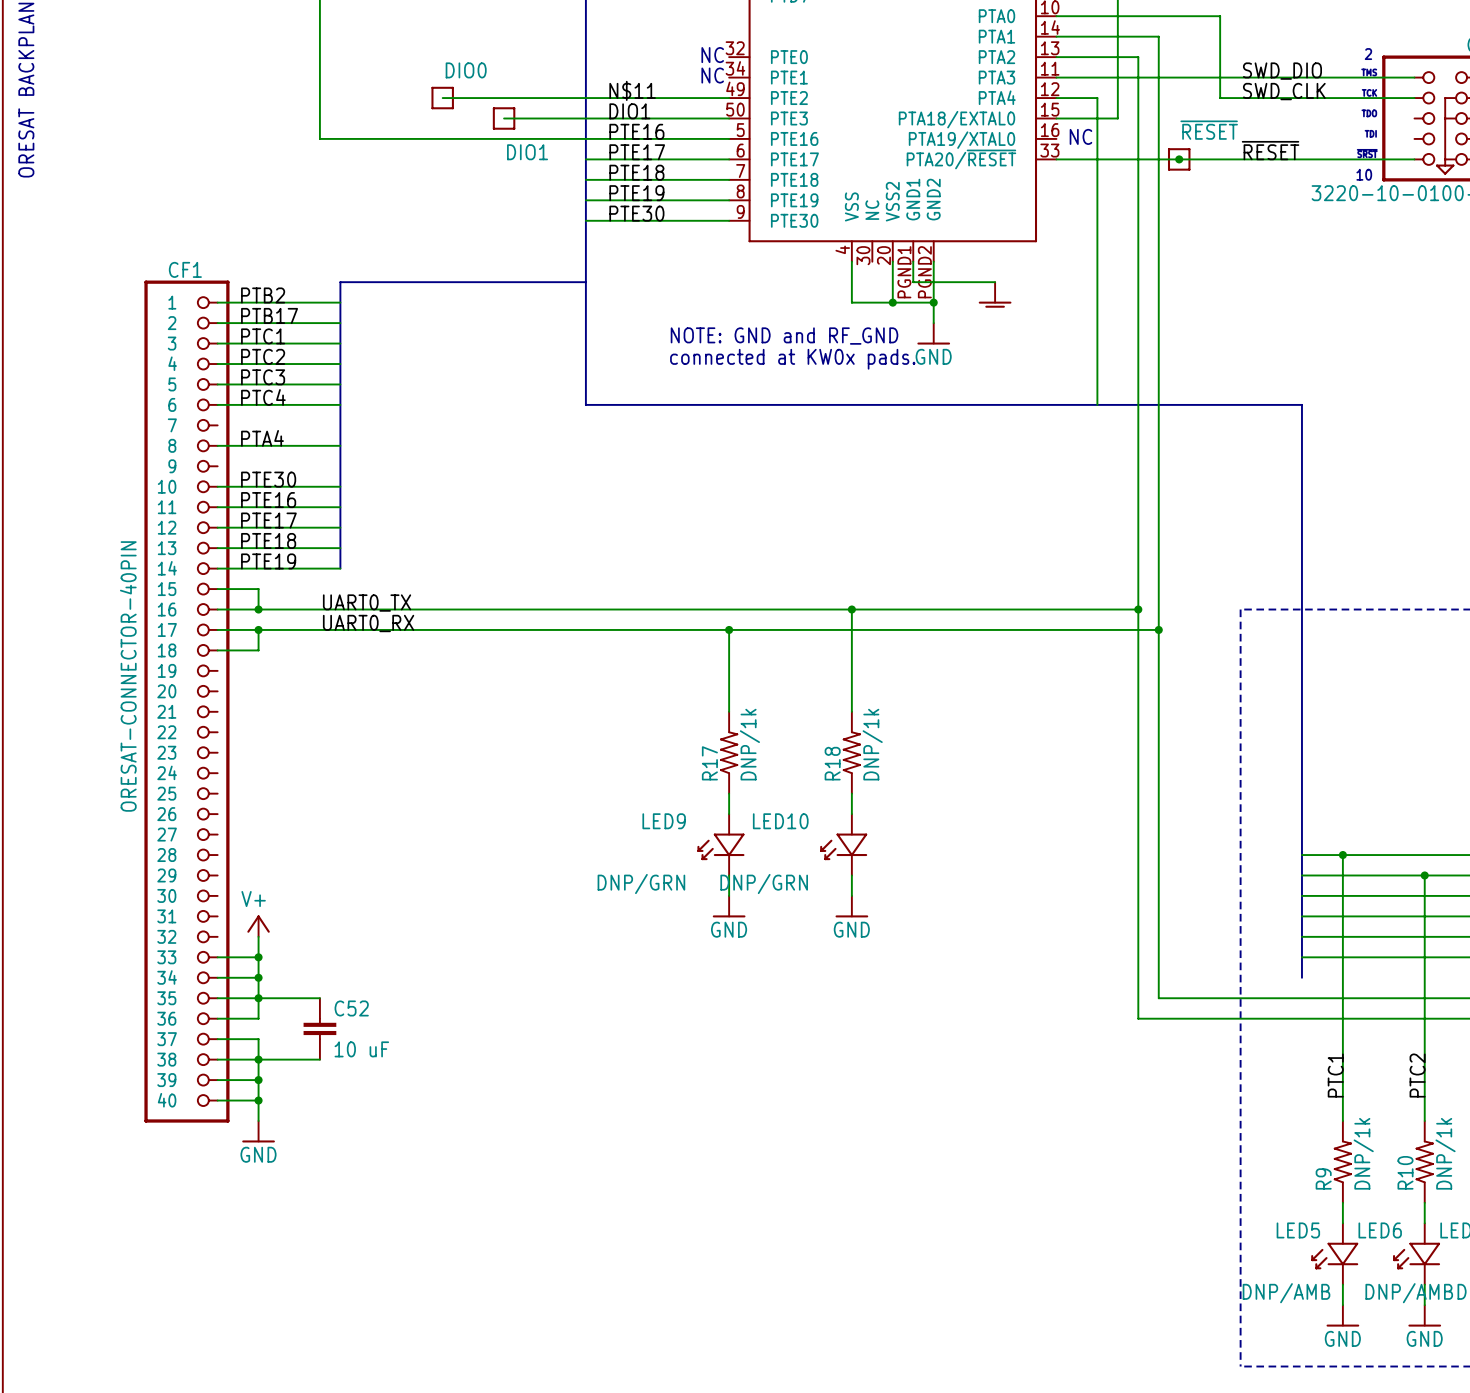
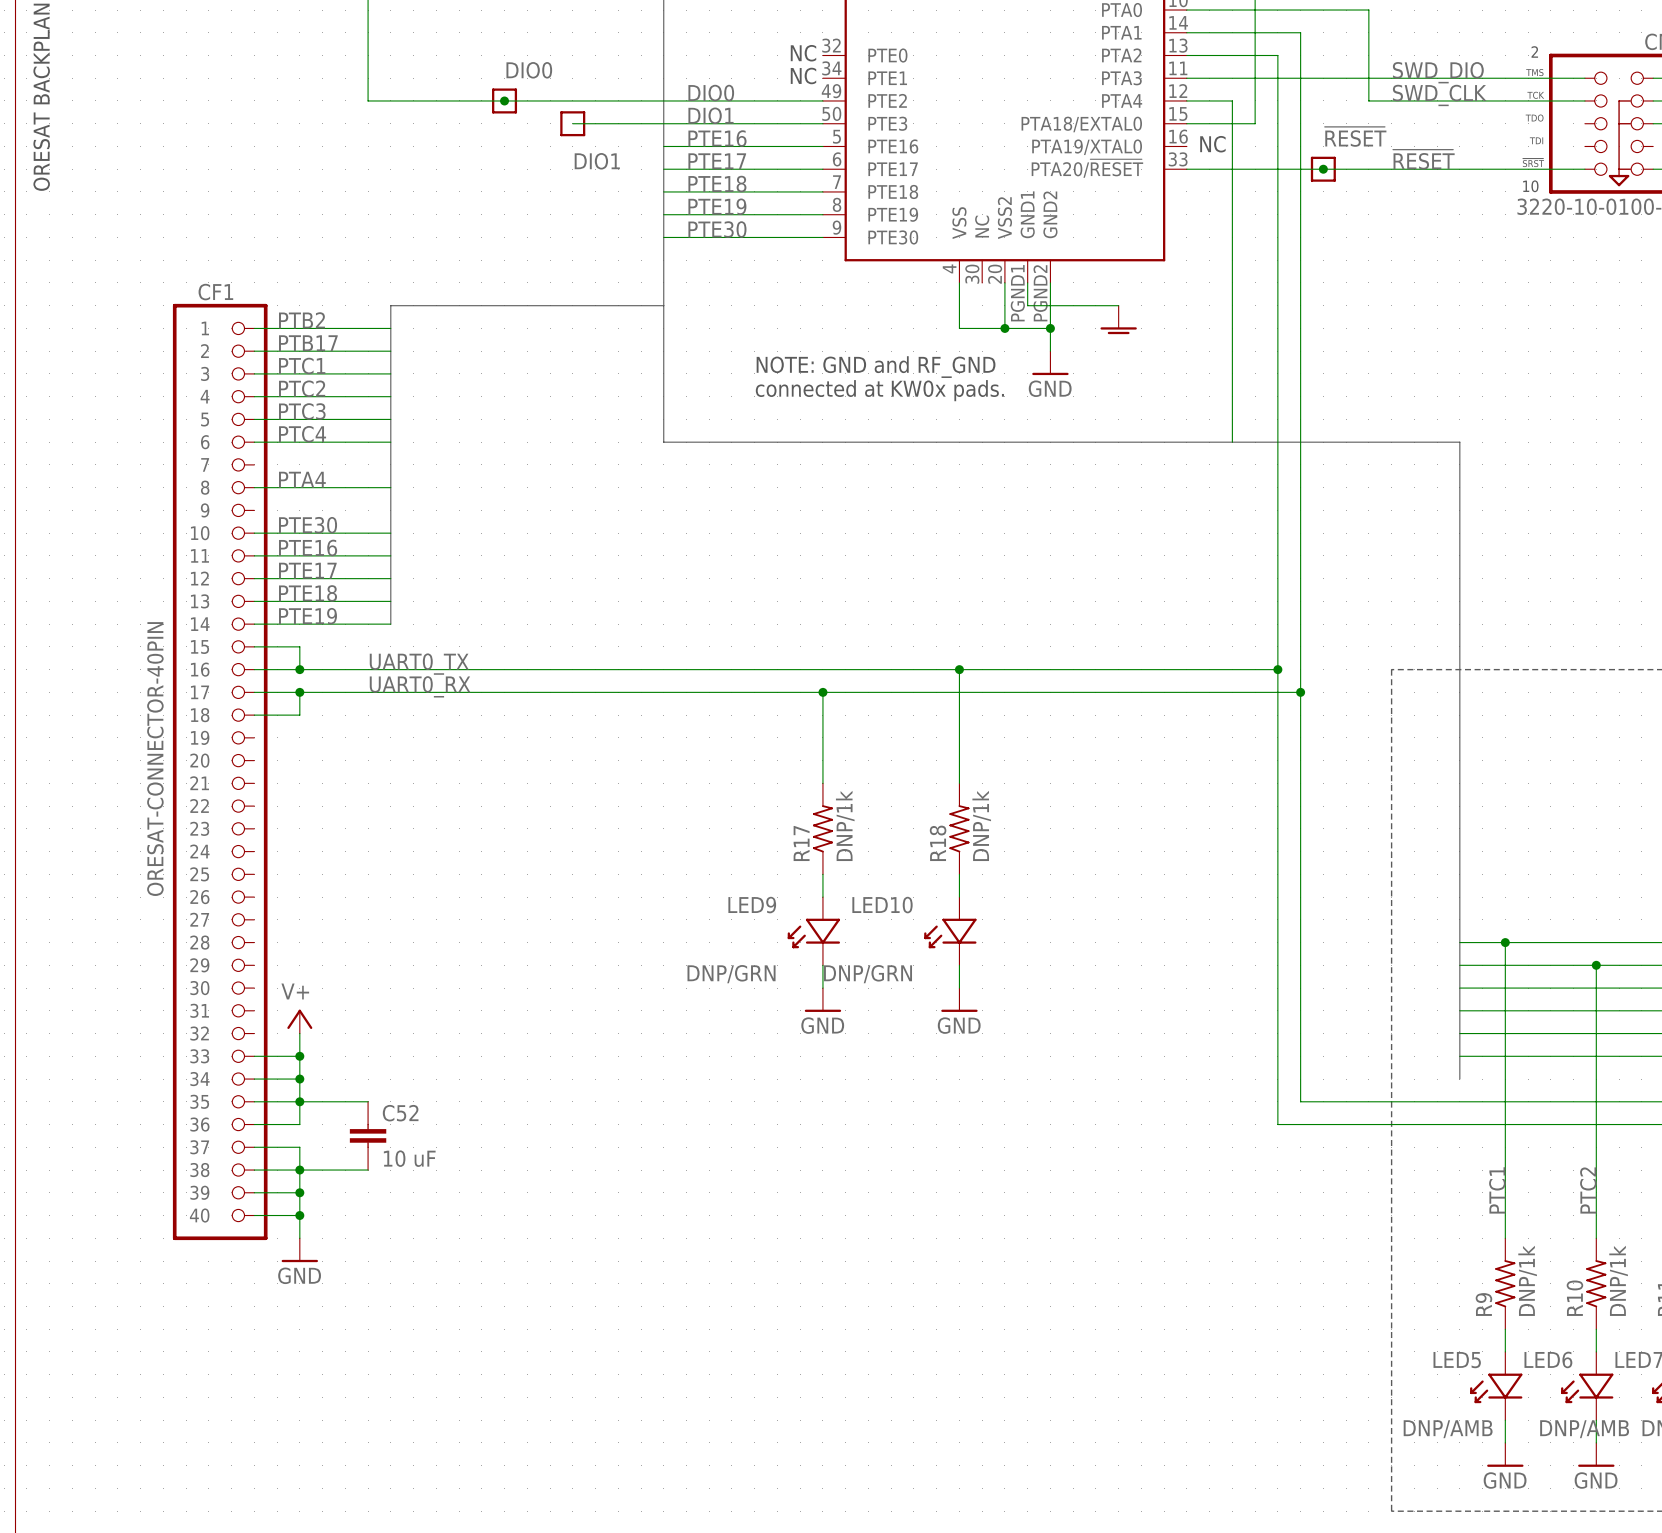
label: N$11 (632, 90) -> DIO0 (711, 93)
wire: (319, 98) (319, 138) (585, 138) -> (368, 100) (504, 100)
junction: none -> (504, 100)

